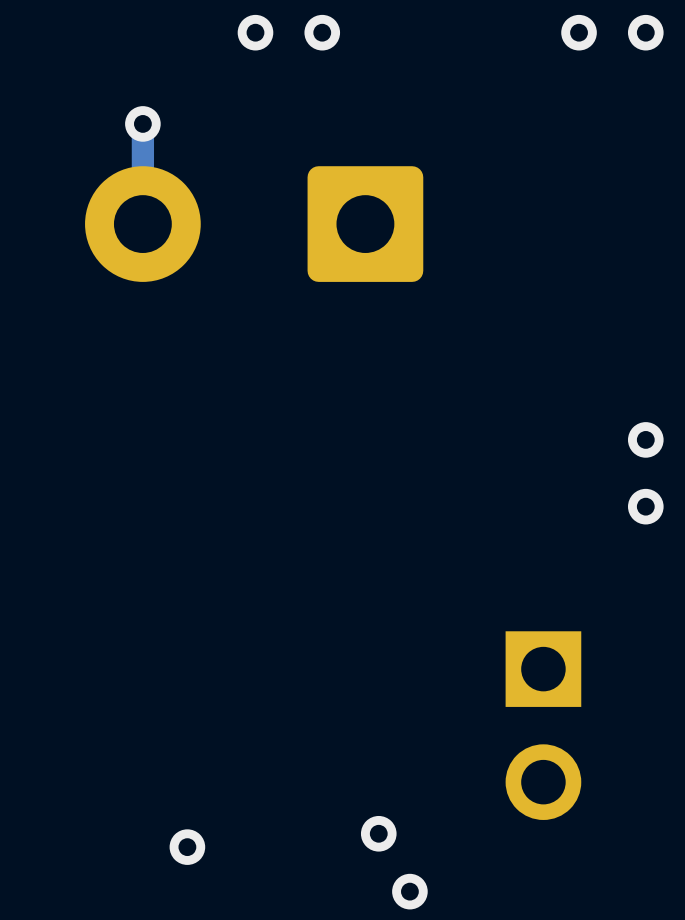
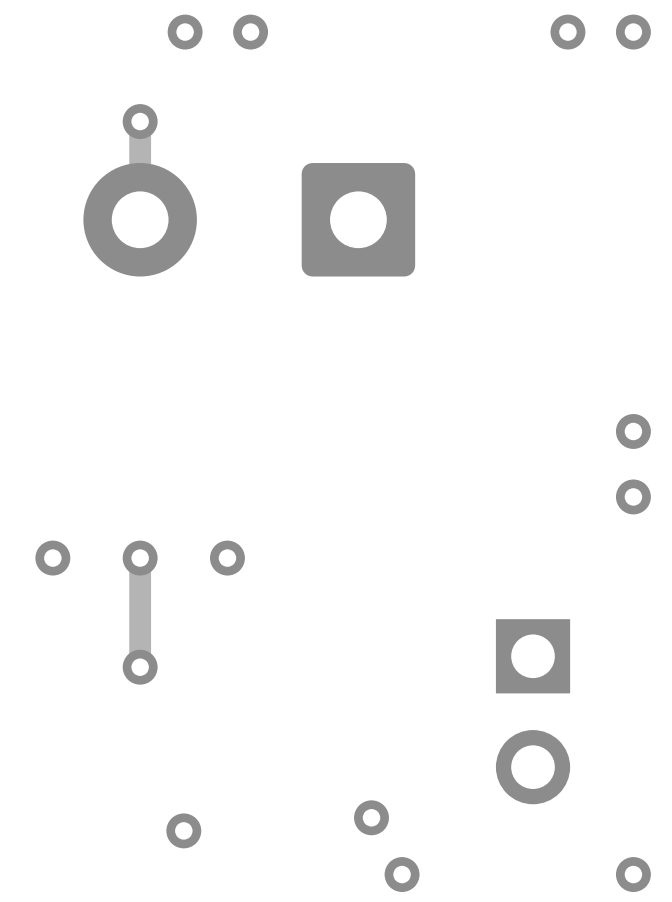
via position: (322, 32) -> (185, 32)
via: none -> (52, 558)
track: none -> (140, 558) (140, 667)
via: none -> (140, 558)
via: none -> (227, 558)
via: none -> (140, 667)
via: none -> (633, 874)

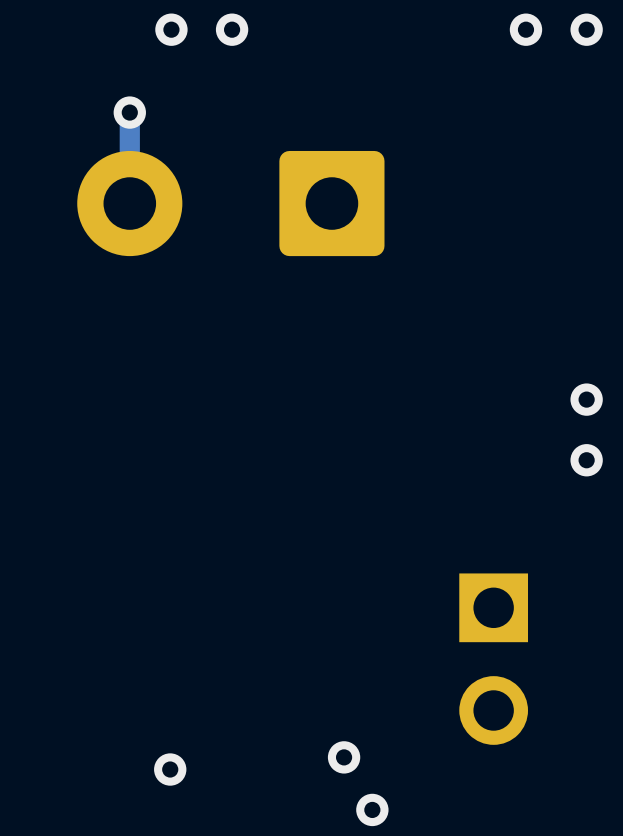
via: (52, 558) -> none
track: (140, 558) (140, 667) -> none
via: (140, 558) -> none
via: (227, 558) -> none
via: (140, 667) -> none
via: (633, 874) -> none

